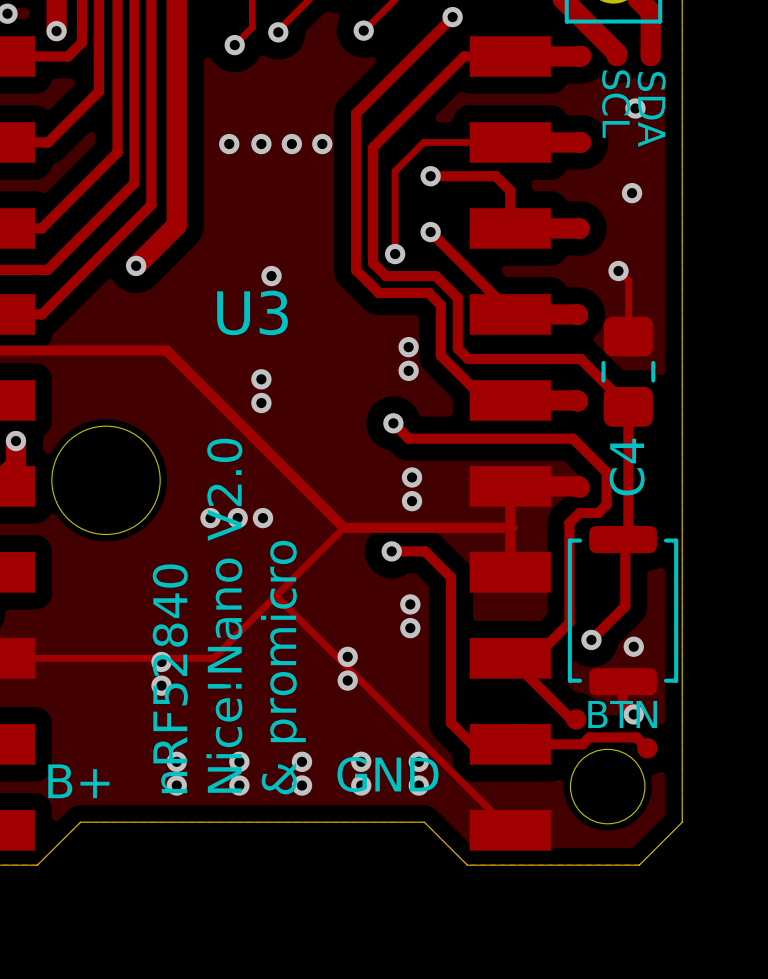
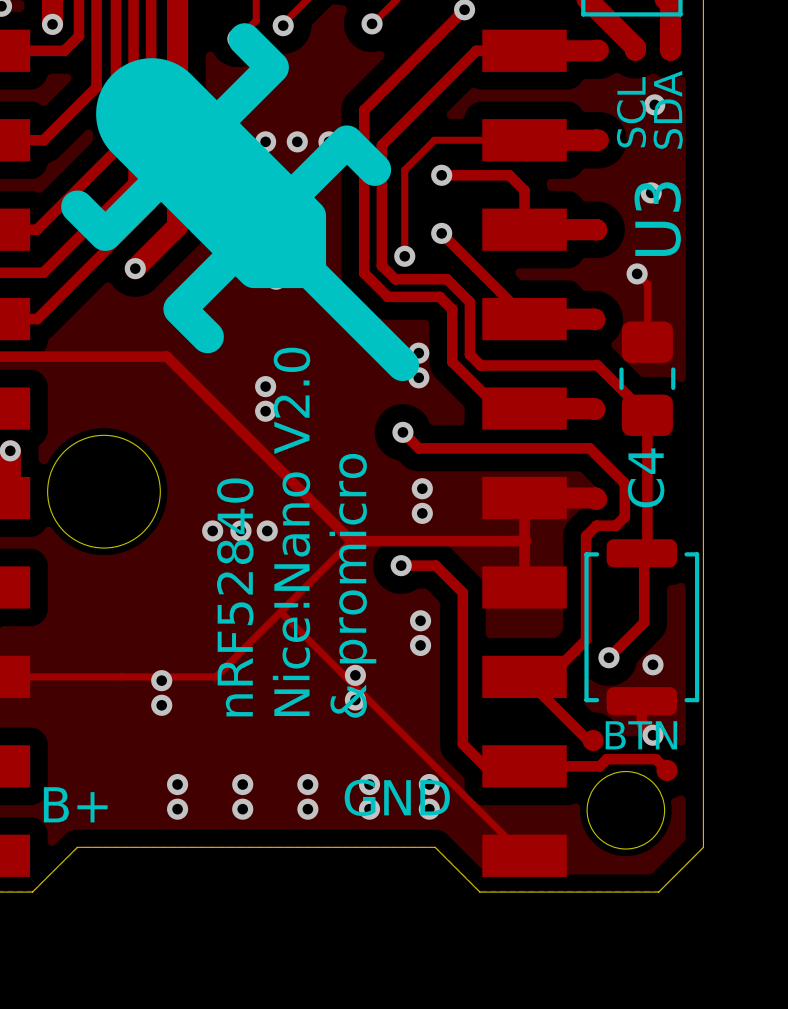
drawing: none -> [61, 23, 419, 382]
text rotation: 0° (616, 104) -> 180° (631, 112)
text rotation: 0° (651, 109) -> 180° (668, 109)
U3 name rotation: 0° (252, 312) -> 90° counterclockwise (657, 219)
U3 name position: U3 (252, 312) -> U3 (657, 219)
text position: Nice!Nano V2.0 (224, 615) -> Nice!Nano V2.0 (291, 531)
text position: & promicro (283, 667) -> & promicro (352, 585)
text position: nRF52840 (170, 678) -> nRF52840 (235, 597)

